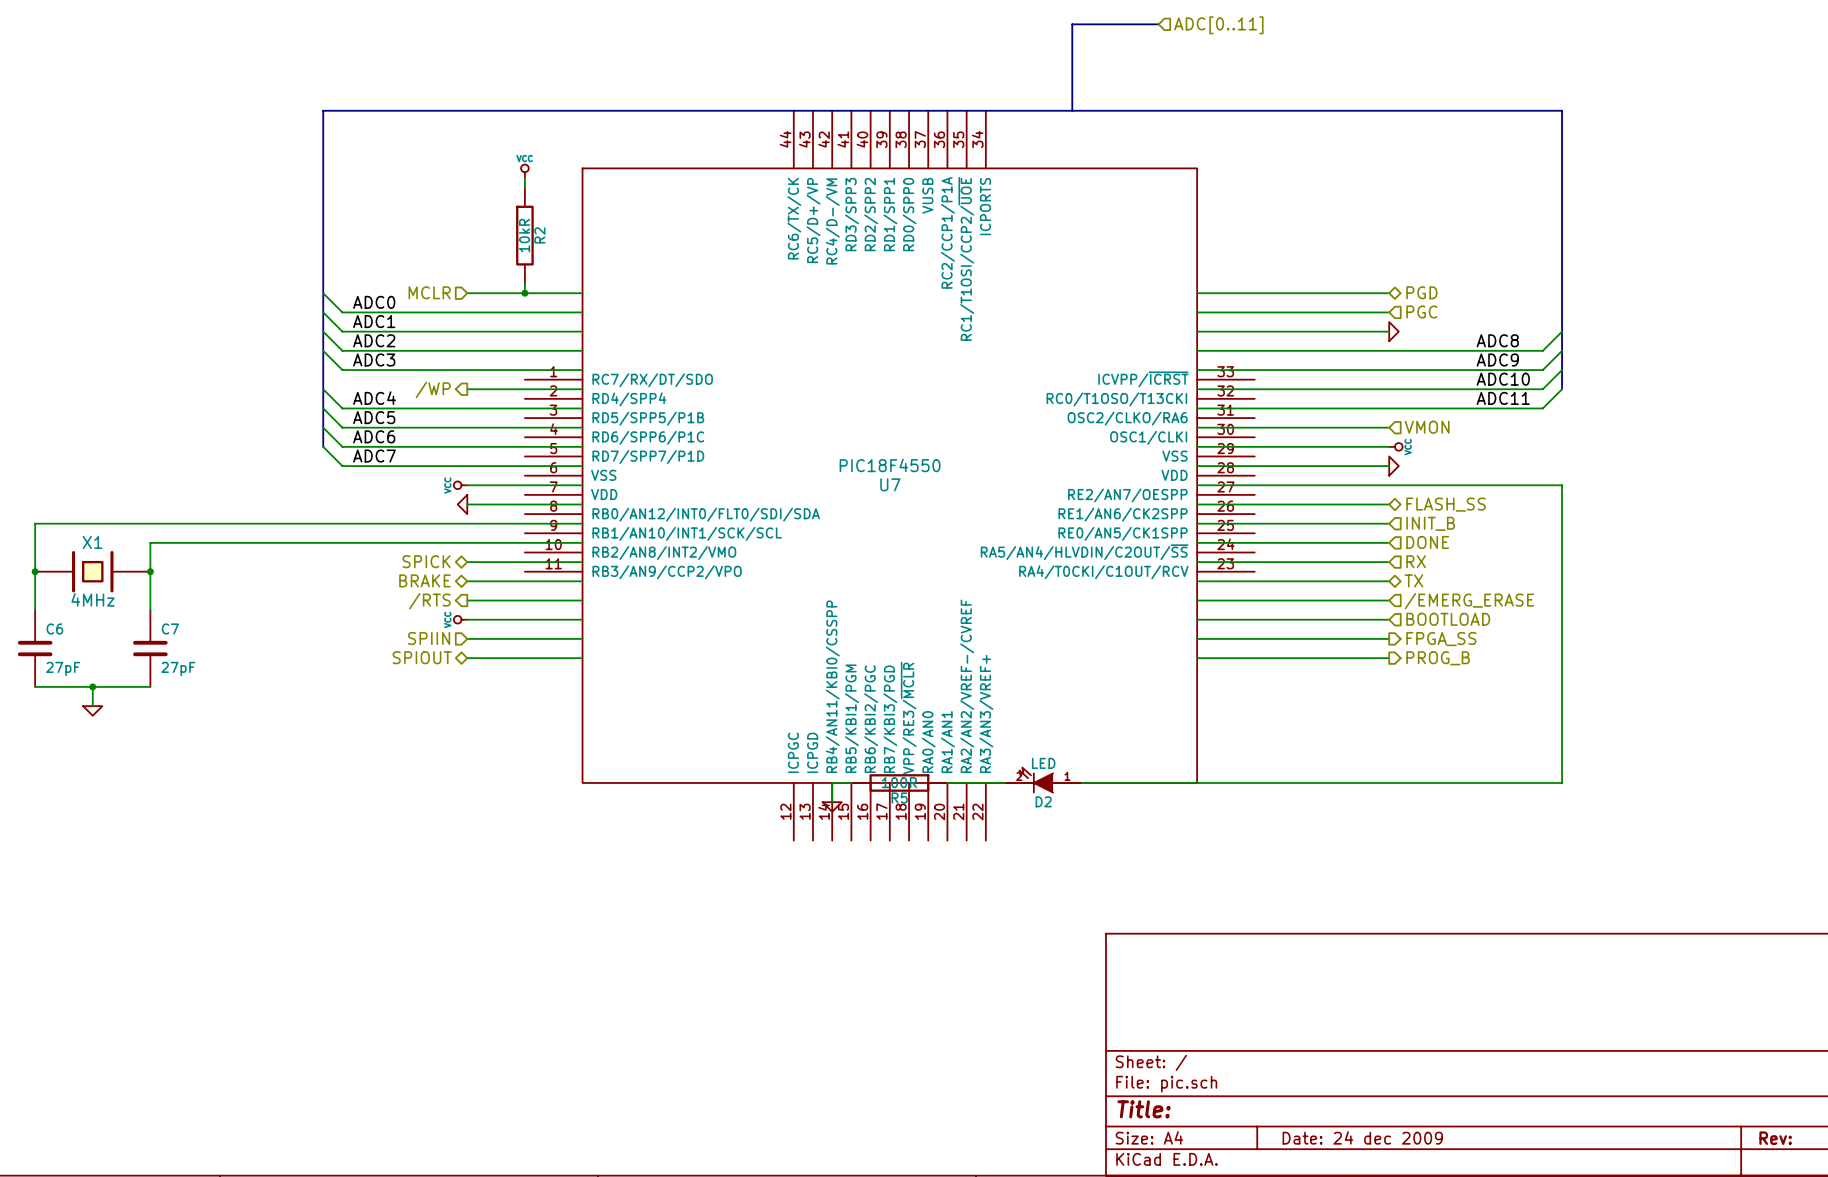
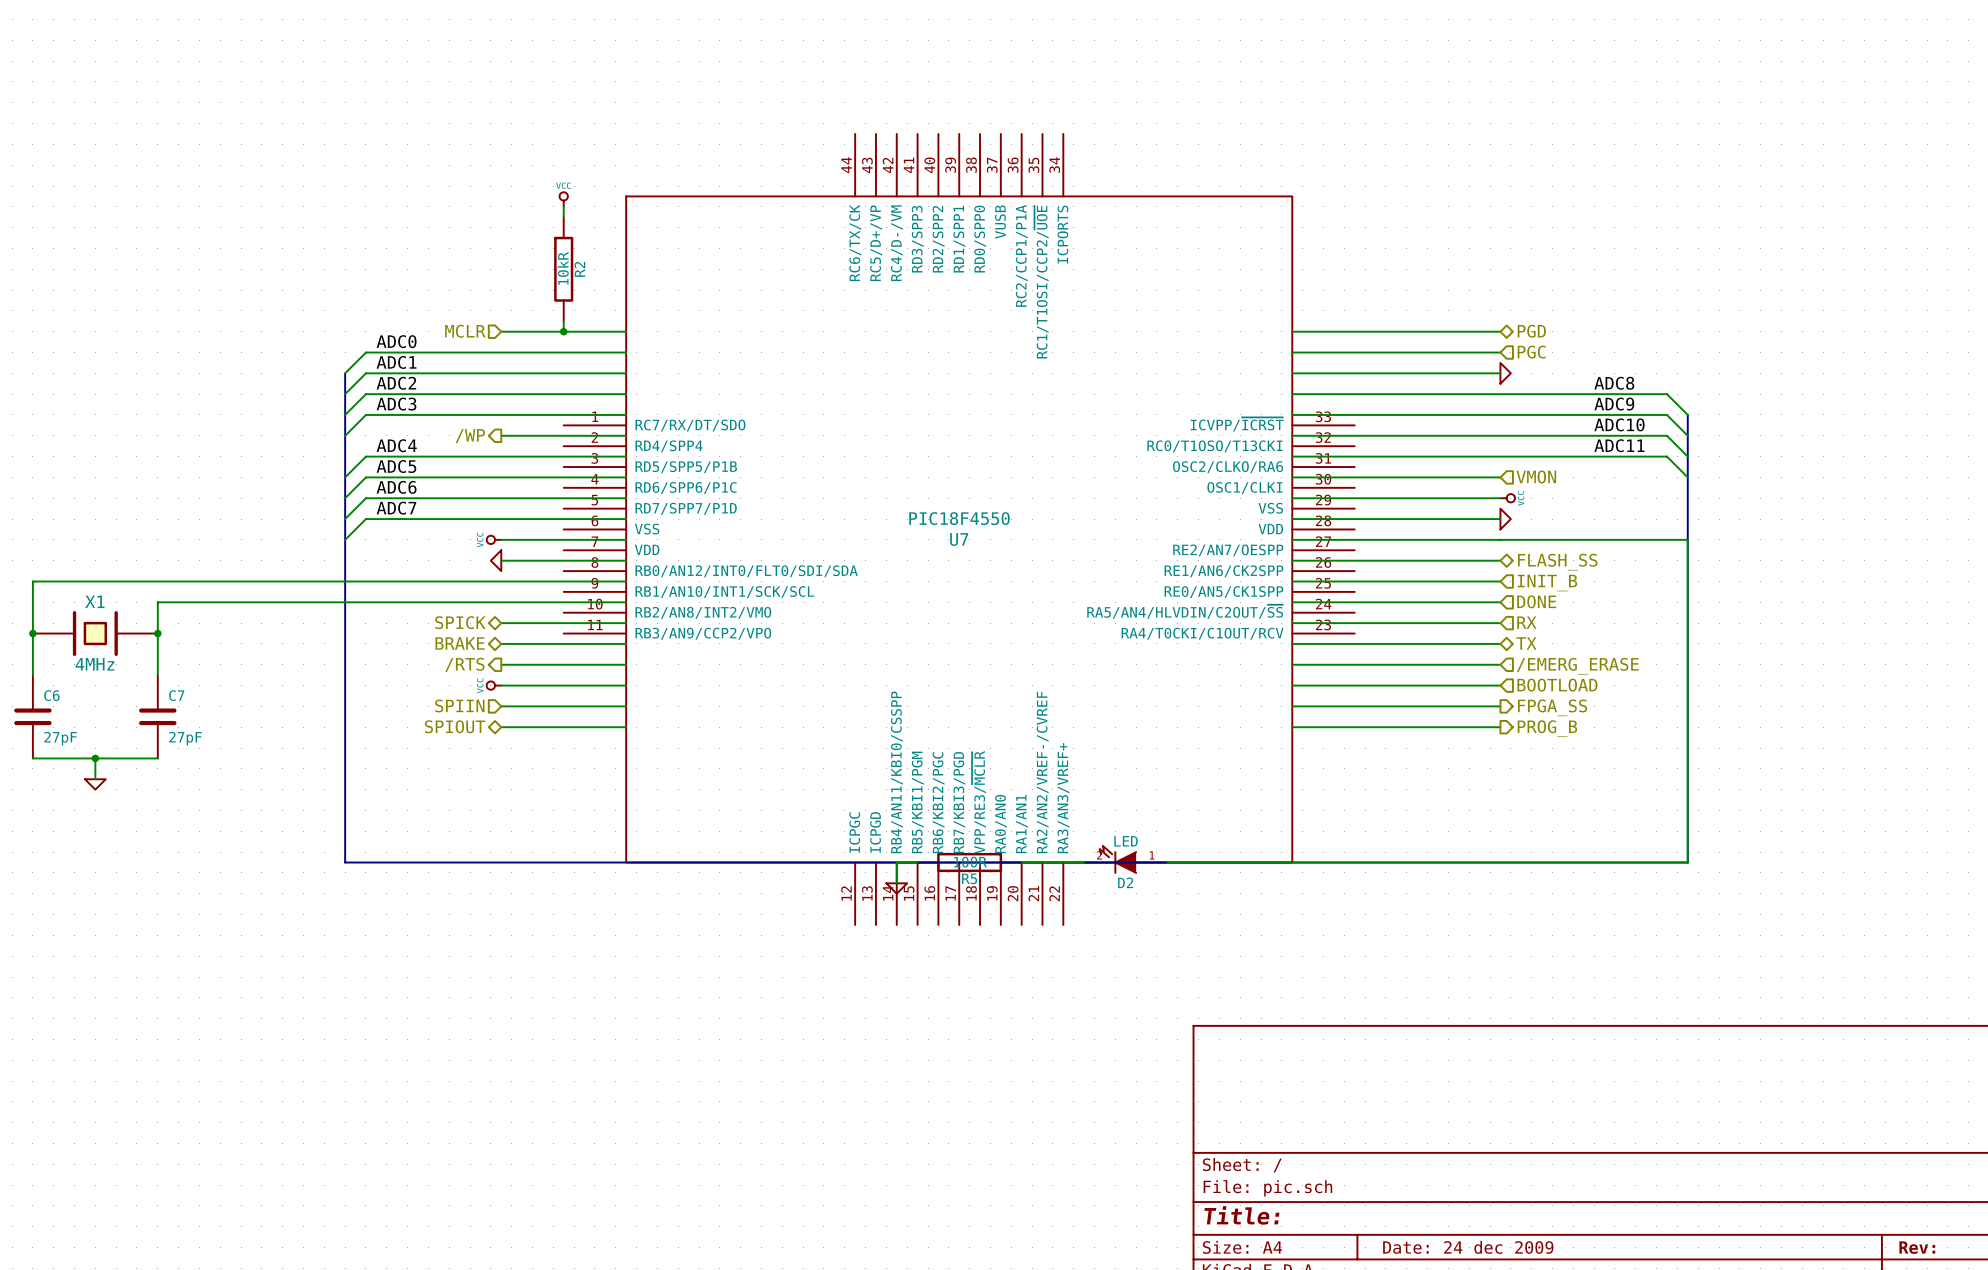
bus: (1158, 24) (1072, 24) (1072, 110) -> none
hierarchical label: ADC[0..11] (1218, 25) -> none
wire: (323, 293) (342, 312) -> (345, 373) (365, 352)
wire: (323, 312) (342, 331) -> none
wire: (323, 331) (342, 350) -> (345, 414) (365, 394)
bus: (323, 331) (323, 110) (1562, 110) (1562, 370) -> none
wire: (1562, 331) (1542, 350) -> (1687, 414) (1666, 394)
wire: (323, 350) (342, 370) -> (345, 394) (365, 373)
wire: (1562, 350) (1542, 370) -> (1687, 435) (1666, 414)
wire: (1562, 370) (1542, 389) -> (1687, 456) (1666, 435)
wire: (323, 389) (342, 408) -> (345, 435) (365, 414)
wire: (1562, 389) (1542, 408) -> (1687, 477) (1666, 456)
bus: none -> (1687, 435) (1687, 862) (345, 862) (345, 498)
wire: (323, 408) (342, 427) -> (345, 498) (365, 477)
wire: (323, 427) (342, 446) -> (345, 477) (365, 456)
wire: (323, 446) (342, 466) -> (345, 539) (365, 519)
wire: none -> (365, 498) (345, 519)

